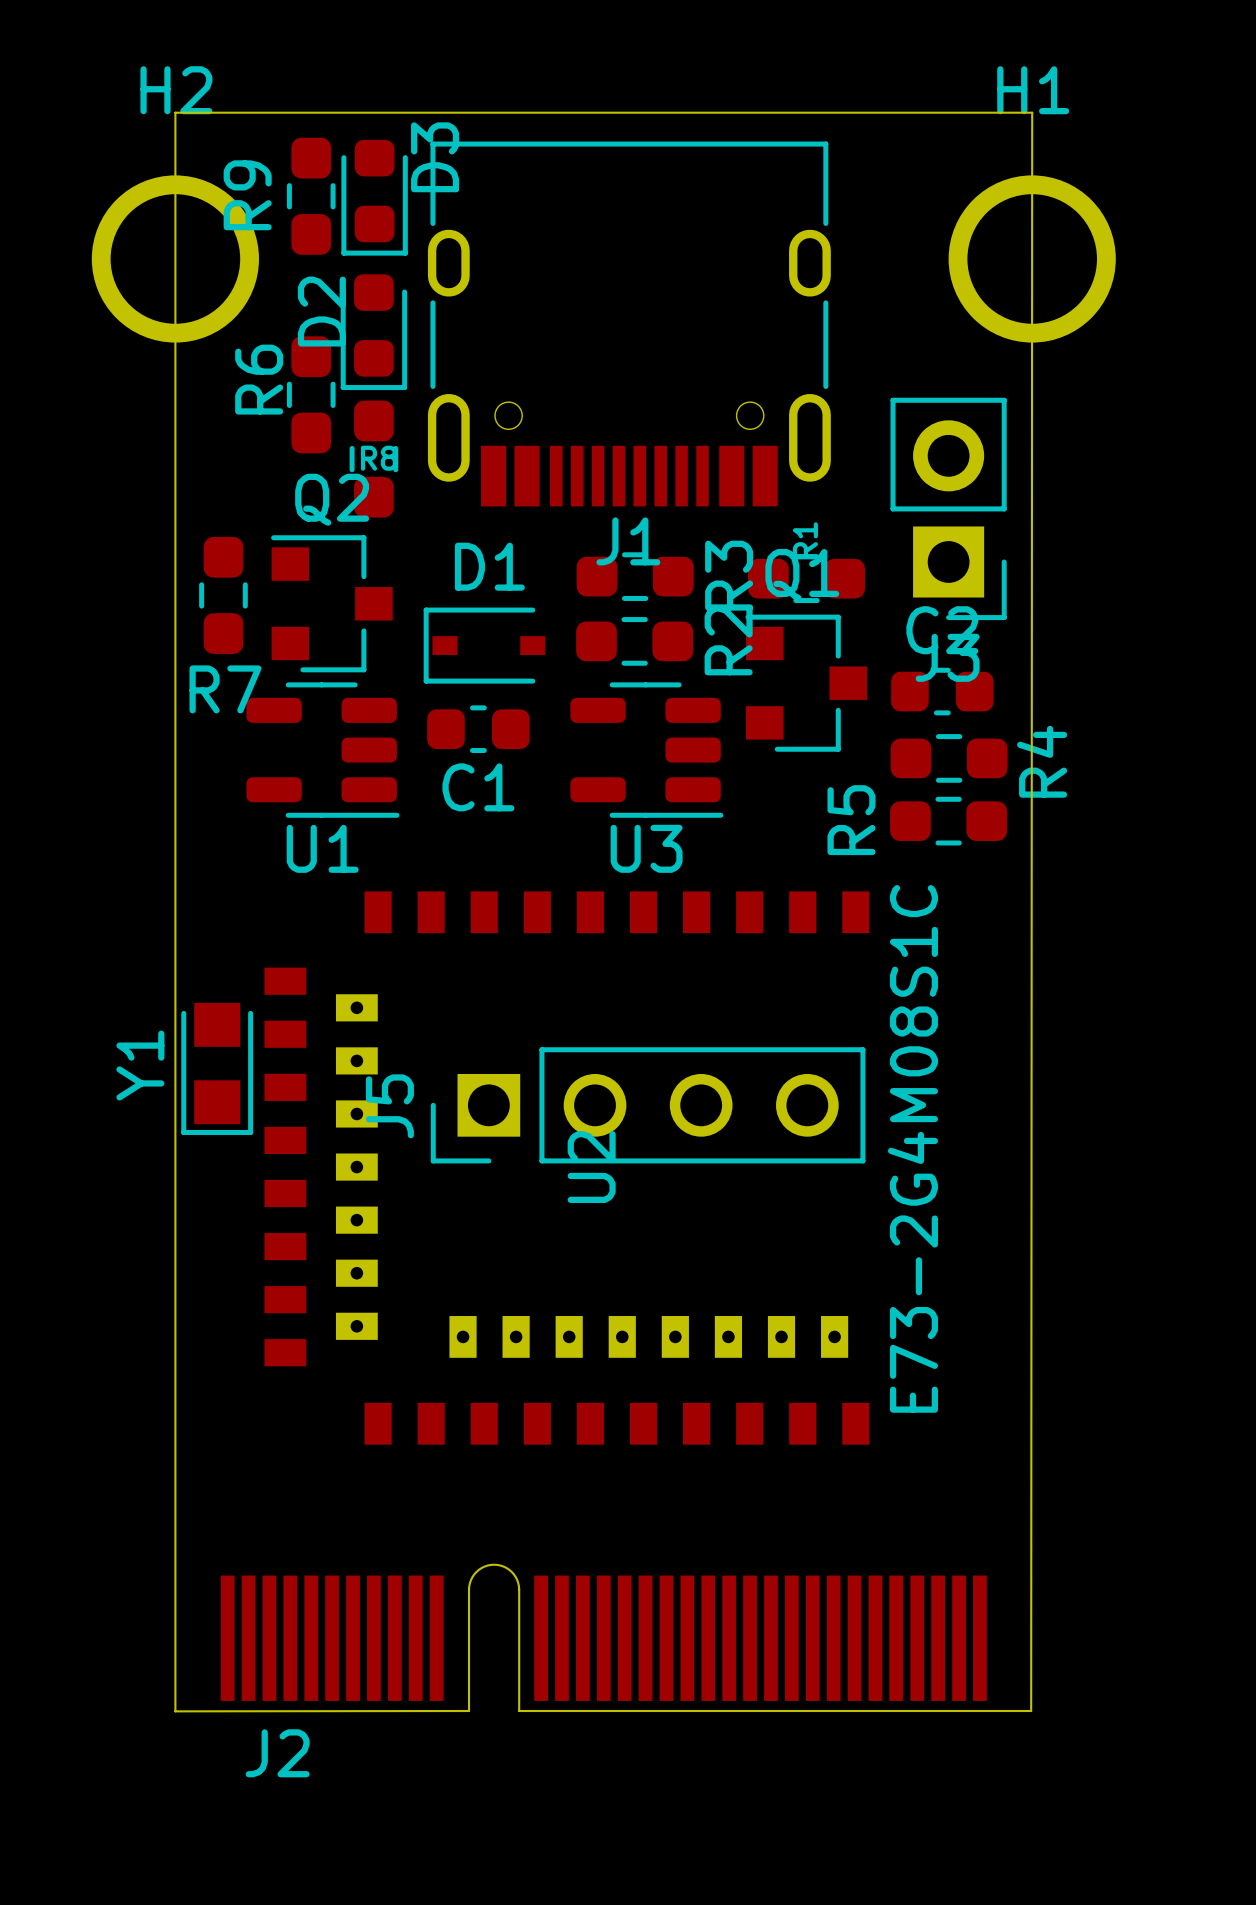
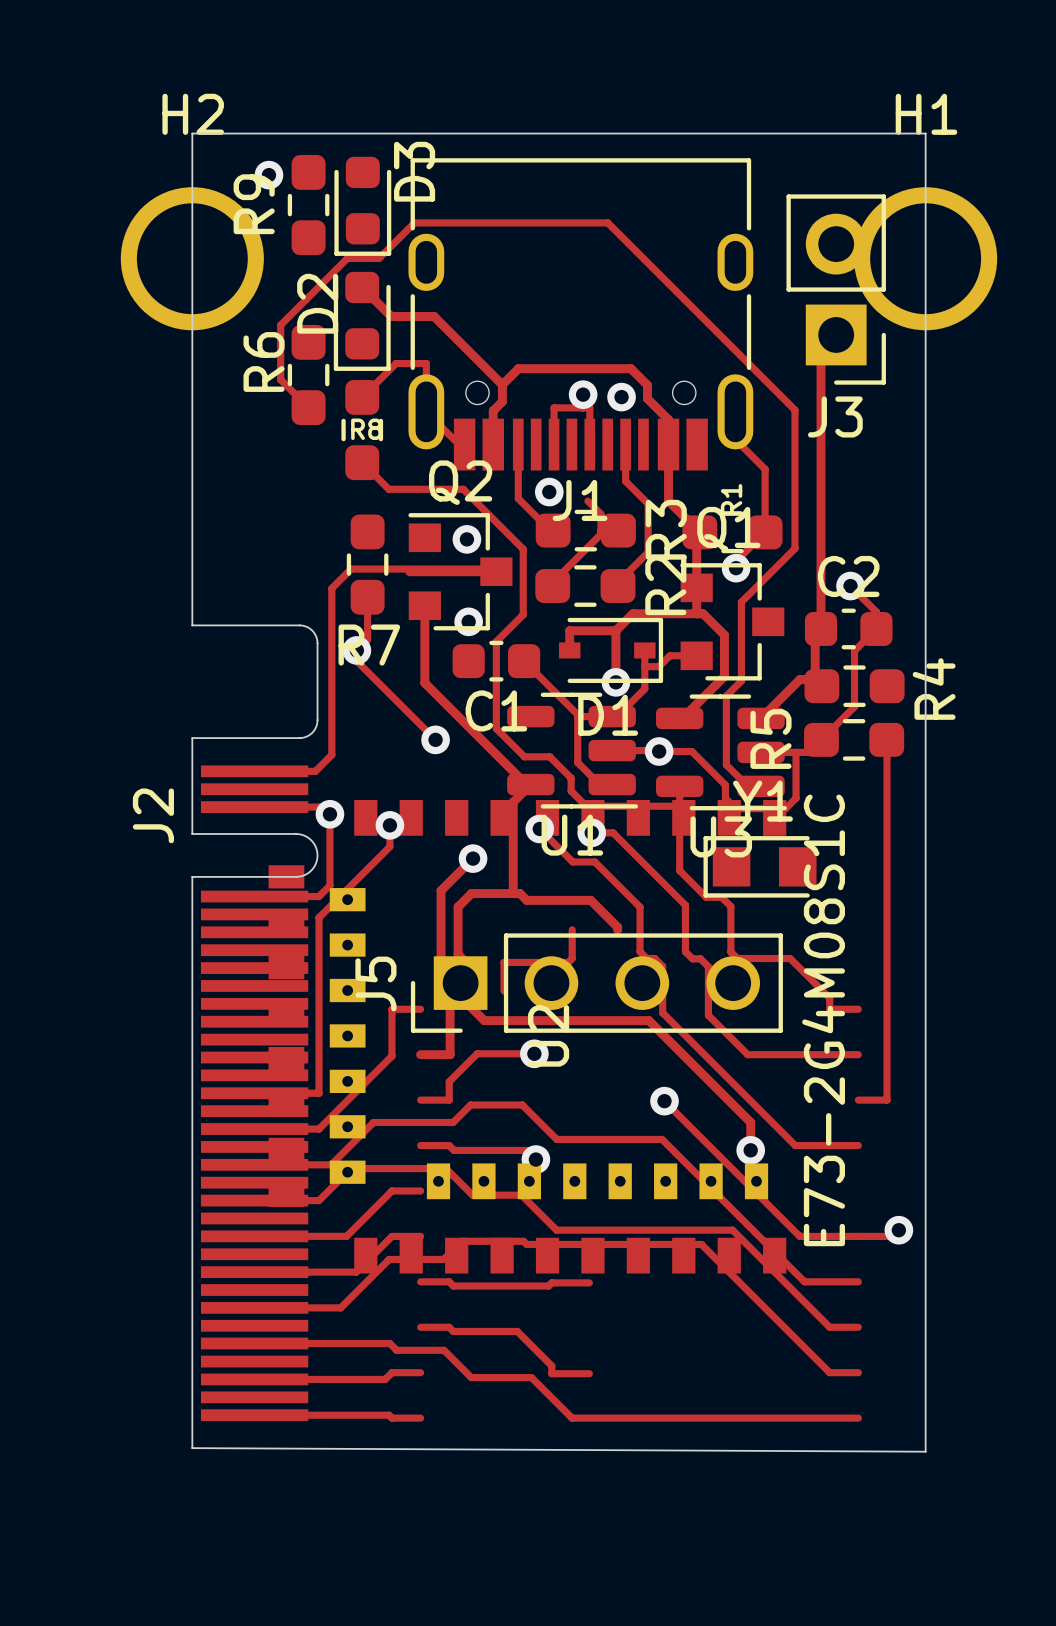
board edge: (1032, 112) (1031, 1710) (519, 1710) (518, 1586) (511, 1572) (497, 1564) (487, 1565) (478, 1569) (472, 1577) (469, 1586) (469, 1710) (175, 1711) (175, 1648) -> (925, 133) (925, 1451) (192, 1448)
via: none -> (268, 175)
track: none -> (362, 287) (391, 316) (434, 316) (502, 384)
track: none -> (836, 334) (821, 350) (821, 629)
track: none -> (502, 384) (518, 368) (630, 368) (647, 385) (647, 398) (668, 419) (668, 501) (699, 532) (696, 535) (696, 613)
track: none -> (502, 384) (502, 401) (493, 410) (493, 444)
via: none -> (583, 394)
track: none -> (362, 397) (396, 363) (426, 363) (426, 411) (459, 444) (464, 444)
via: none -> (621, 397)
track: none -> (308, 407) (280, 379) (280, 325) (347, 258) (379, 258) (414, 222) (607, 222) (794, 410) (794, 548) (741, 602) (741, 681) (726, 696) (726, 764) (747, 786) (761, 786)
track: none -> (735, 411) (735, 439) (765, 469) (765, 532) (736, 561) (736, 575)
track: none -> (518, 444) (518, 498) (550, 530) (553, 530)
track: none -> (554, 444) (554, 407) (589, 407) (589, 444)
track: none -> (625, 444) (625, 481) (648, 503) (648, 552) (618, 582)
track: none -> (362, 462) (388, 489) (463, 489) (523, 549) (523, 614) (496, 641) (496, 728) (524, 756) (549, 756) (571, 778) (571, 791) (586, 806) (679, 806)
J3 position: (948, 508) -> (836, 289)
via: none -> (549, 492)
track: none -> (587, 501) (600, 514) (600, 534) (552, 582)
via: none -> (466, 539)
R7 position: (223, 595) -> (367, 564)
Q2 position: (331, 603) -> (460, 571)
via: none -> (736, 568)
track: none -> (409, 571) (496, 571) (493, 569) (351, 569) (331, 588) (331, 754) (315, 771) (254, 771)
track: none -> (850, 586) (876, 611) (876, 628) (854, 650) (854, 706) (808, 752) (761, 752)
via: none -> (850, 586)
D1 rotation: 0° (484, 645) -> 180° (611, 650)
D1 position: (484, 645) -> (611, 650)
track: none -> (367, 597) (367, 639) (356, 650) (356, 661) (435, 739)
track: none -> (424, 605) (424, 683) (528, 786)
via: none -> (468, 621)
board edge: (175, 687) (175, 819) -> (192, 625) (301, 625) (312, 630) (317, 643) (317, 722) (310, 734) (299, 738) (192, 738)
track: none -> (615, 630) (615, 682)
track: none -> (615, 630) (632, 613) (703, 613) (724, 635) (724, 676) (682, 718) (679, 718)
track: none -> (615, 630) (569, 630) (569, 650)
track: none -> (815, 632) (815, 679)
via: none -> (356, 650)
track: none -> (644, 650) (644, 688) (617, 716) (579, 716)
track: none -> (696, 655) (669, 655) (659, 666) (644, 666)
C1 position: (478, 729) -> (496, 661)
track: none -> (524, 661) (579, 716)
U1 position: (322, 750) -> (572, 750)
U3 position: (646, 750) -> (721, 752)
track: none -> (815, 679) (799, 679) (761, 718)
via: none -> (615, 682)
track: none -> (579, 716) (577, 718) (577, 762) (599, 784) (612, 784)
via: none -> (435, 739)
track: none -> (886, 740) (886, 1100) (858, 1100)
track: none -> (612, 750) (691, 751) (725, 785) (725, 798) (735, 808) (785, 808) (796, 798) (796, 752)
via: none -> (659, 751)
track: none -> (530, 784) (513, 802) (513, 893)
track: none -> (679, 786) (679, 870) (706, 897) (721, 897) (730, 906) (730, 952) (737, 958) (790, 958) (829, 998) (829, 1009) (858, 1009)
track: none -> (254, 807) (319, 807) (326, 814) (329, 814) (329, 885) (319, 896) (254, 896)
via: none -> (329, 814)
track: none -> (389, 825) (389, 846) (319, 917) (319, 1093) (254, 1093)
via: none -> (389, 825)
track: none -> (539, 828) (572, 861) (594, 861) (640, 907) (640, 951) (646, 958) (654, 958) (662, 966) (662, 1012) (795, 1145) (858, 1145)
via: none -> (539, 828)
track: none -> (591, 832) (613, 832) (685, 905) (685, 951) (692, 958) (700, 958) (708, 966) (708, 1015) (747, 1054) (858, 1054)
via: none -> (591, 832)
board edge: (175, 931) (175, 981) -> (296, 833) (309, 838) (314, 844) (317, 852) (314, 866) (304, 875) (296, 876) (192, 876)
board edge: none -> (192, 833) (296, 833)
track: none -> (473, 858) (441, 890) (441, 965) (450, 974) (450, 1054) (420, 1054)
via: none -> (473, 858)
track: none -> (572, 929) (572, 958) (568, 962) (504, 962) (504, 991)
track: none -> (617, 929) (617, 927) (590, 900) (526, 900) (520, 893) (471, 893) (458, 906) (458, 954) (469, 966) (469, 1006) (484, 1020) (648, 1020) (750, 1122) (750, 1150)
Y1 rotation: 0° (217, 1068) -> 90° clockwise (760, 866)
Y1 position: (217, 1068) -> (760, 866)
track: none -> (420, 1009) (391, 1009) (391, 1056) (319, 1129) (254, 1129)
track: none -> (534, 1053) (477, 1053) (449, 1081) (449, 1100) (420, 1100)
via: none -> (534, 1053)
track: none -> (664, 1101) (799, 1236) (886, 1236) (893, 1230) (898, 1230)
via: none -> (664, 1101)
track: none -> (420, 1145) (449, 1145) (454, 1150) (526, 1150) (535, 1159)
via: none -> (750, 1150)
via: none -> (535, 1159)
track: none -> (254, 1164) (331, 1164) (373, 1122) (453, 1122) (470, 1105) (522, 1105) (556, 1139) (662, 1139) (804, 1281) (858, 1281)
track: none -> (420, 1190) (391, 1190) (346, 1236) (254, 1236)
track: none -> (254, 1200) (319, 1200) (351, 1168) (446, 1168) (472, 1195) (521, 1195) (556, 1230) (732, 1230) (829, 1327) (858, 1327)
via: none -> (898, 1230)
track: none -> (420, 1236) (391, 1236) (356, 1272) (254, 1272)
track: none -> (420, 1281) (449, 1281) (453, 1286) (548, 1286) (551, 1282) (589, 1282)
track: none -> (254, 1307) (340, 1307) (389, 1259) (443, 1259) (461, 1241) (523, 1241) (526, 1244) (701, 1244) (829, 1372) (858, 1372)
track: none -> (420, 1327) (449, 1327) (453, 1331) (517, 1331) (551, 1365) (551, 1373) (589, 1373)
track: none -> (254, 1343) (389, 1343) (396, 1350) (444, 1350) (471, 1377) (531, 1377) (572, 1418) (858, 1418)
track: none -> (420, 1372) (391, 1372) (385, 1379) (254, 1379)
J2 footprint: [220, 1575, 987, 1701] -> [200, 765, 309, 1422]
track: none -> (254, 1415) (389, 1415) (391, 1418) (420, 1418)
J2 name position: J2 (277, 1753) -> J2 (153, 815)

